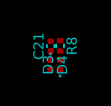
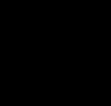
R8: (60, 45) -> none
C21: (50, 46) -> none
D4: (50, 62) -> none
D3: (60, 66) -> none

